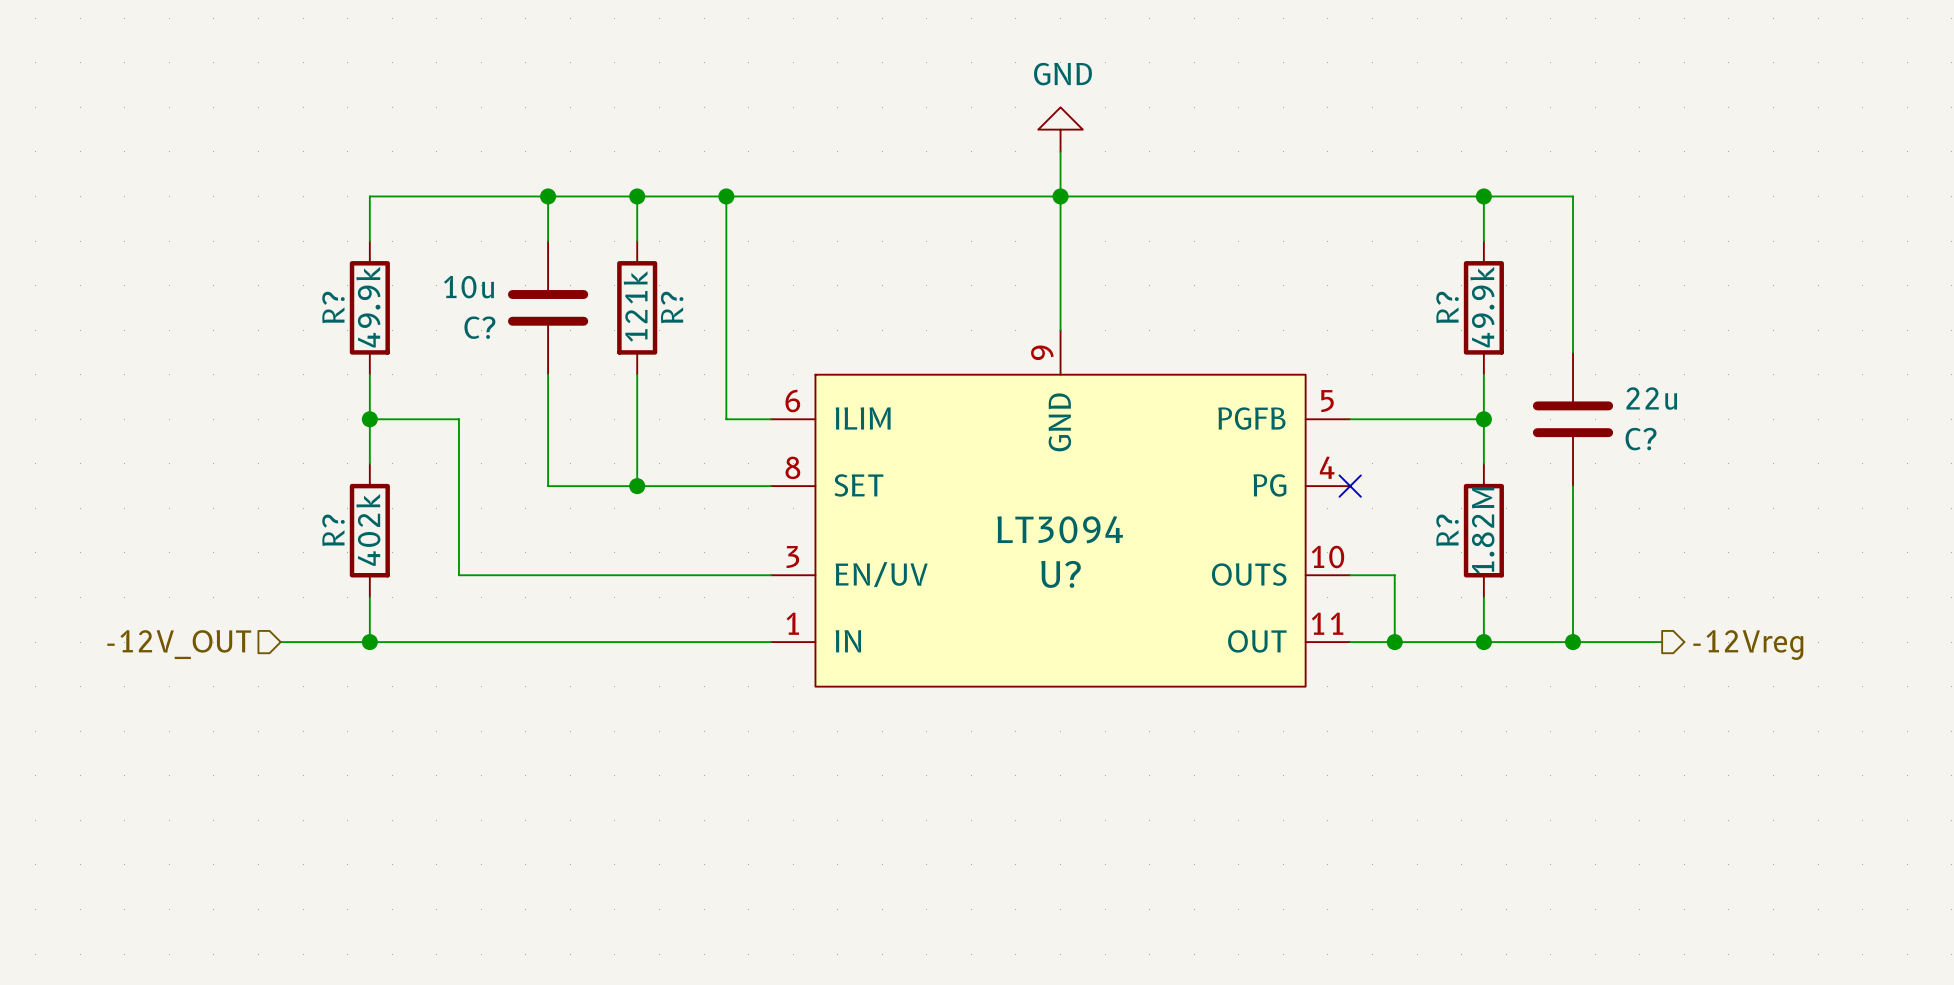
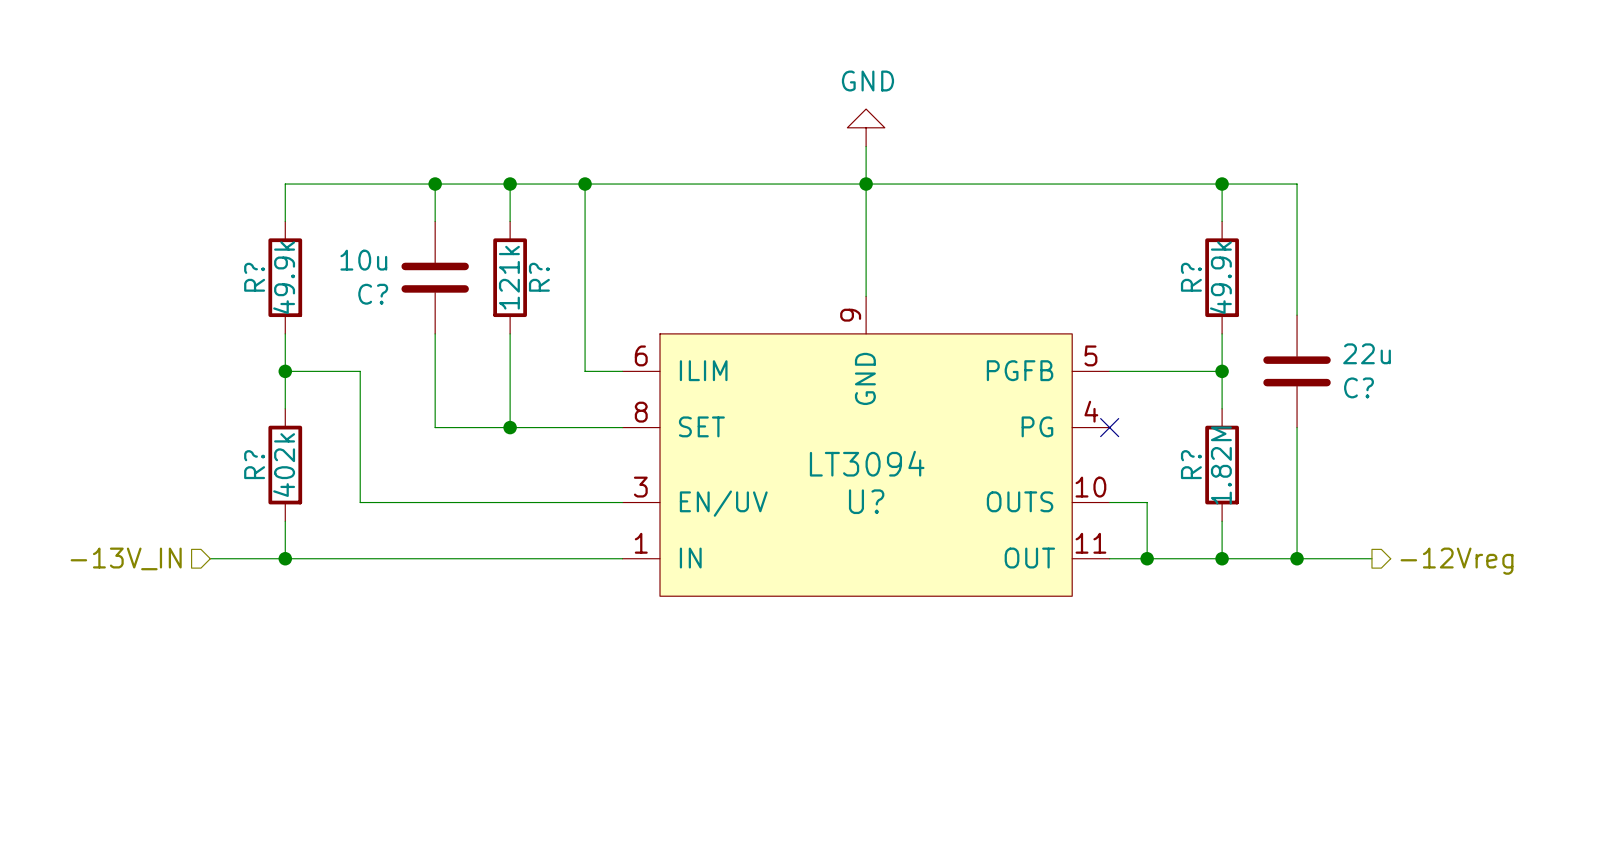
hierarchical label: -12V_OUT (179, 644) -> -13V_IN (126, 558)

